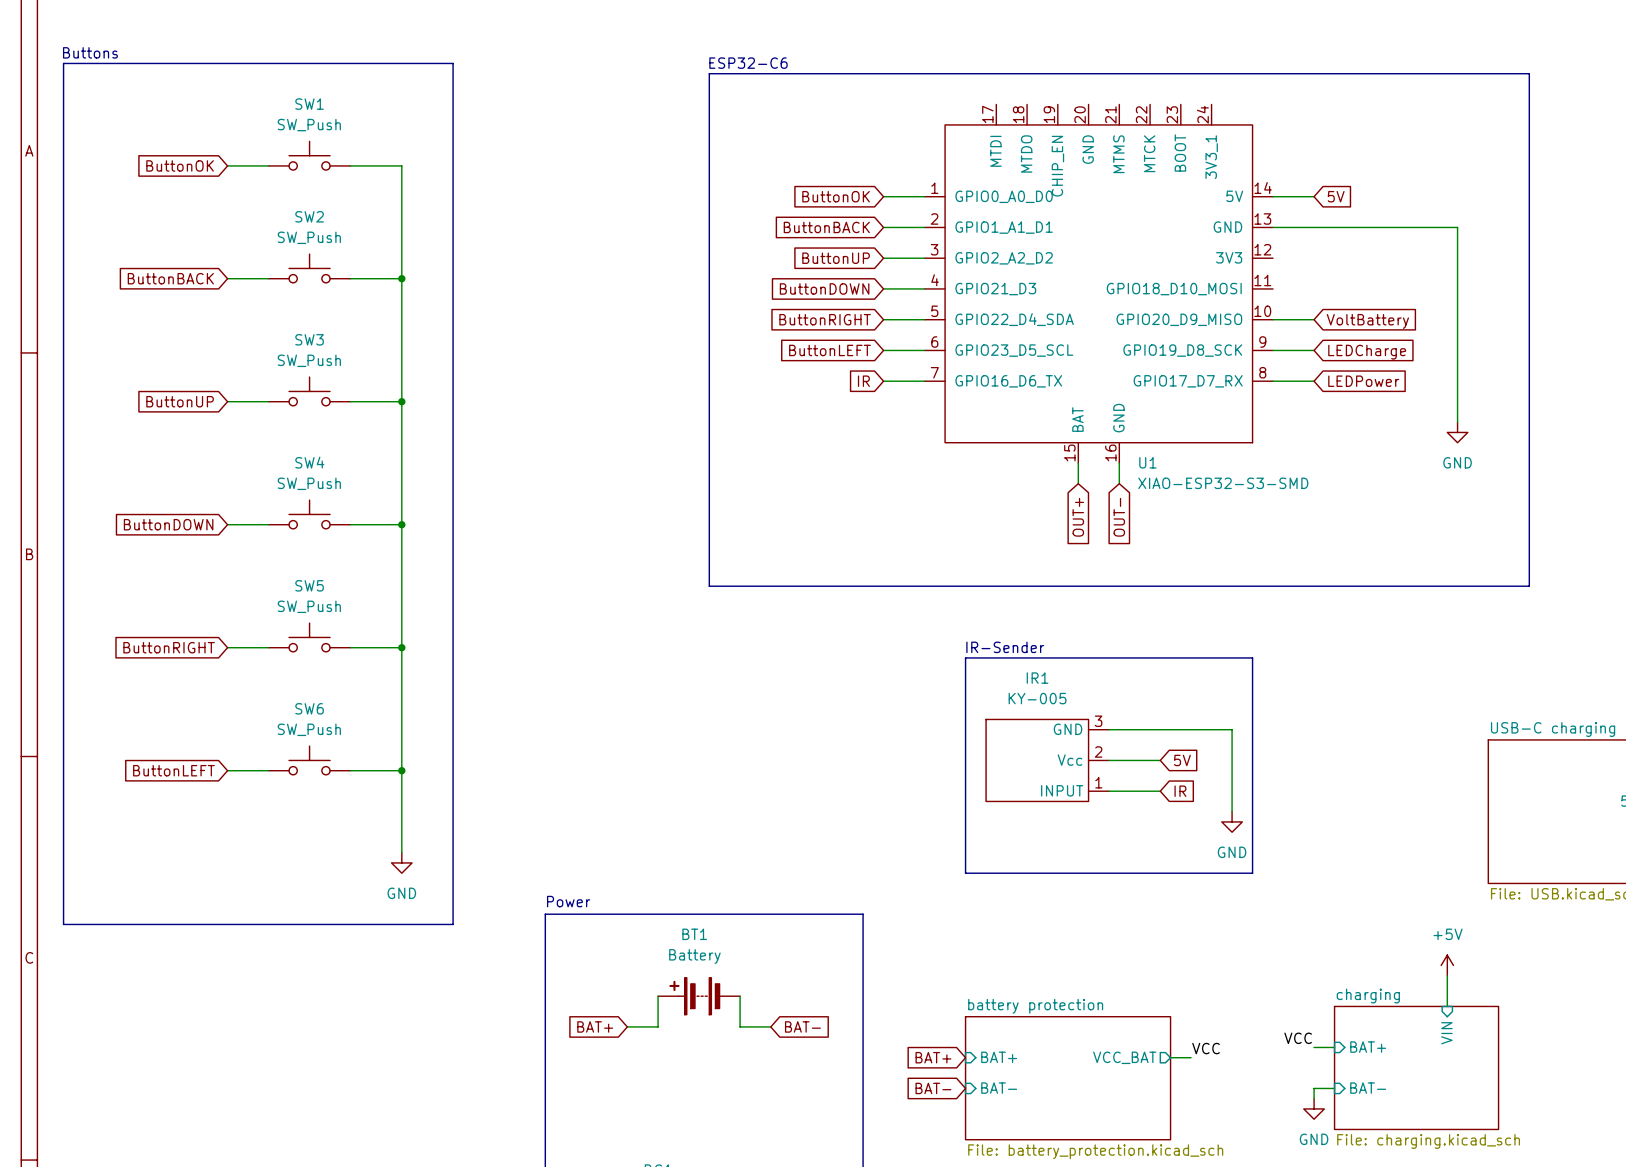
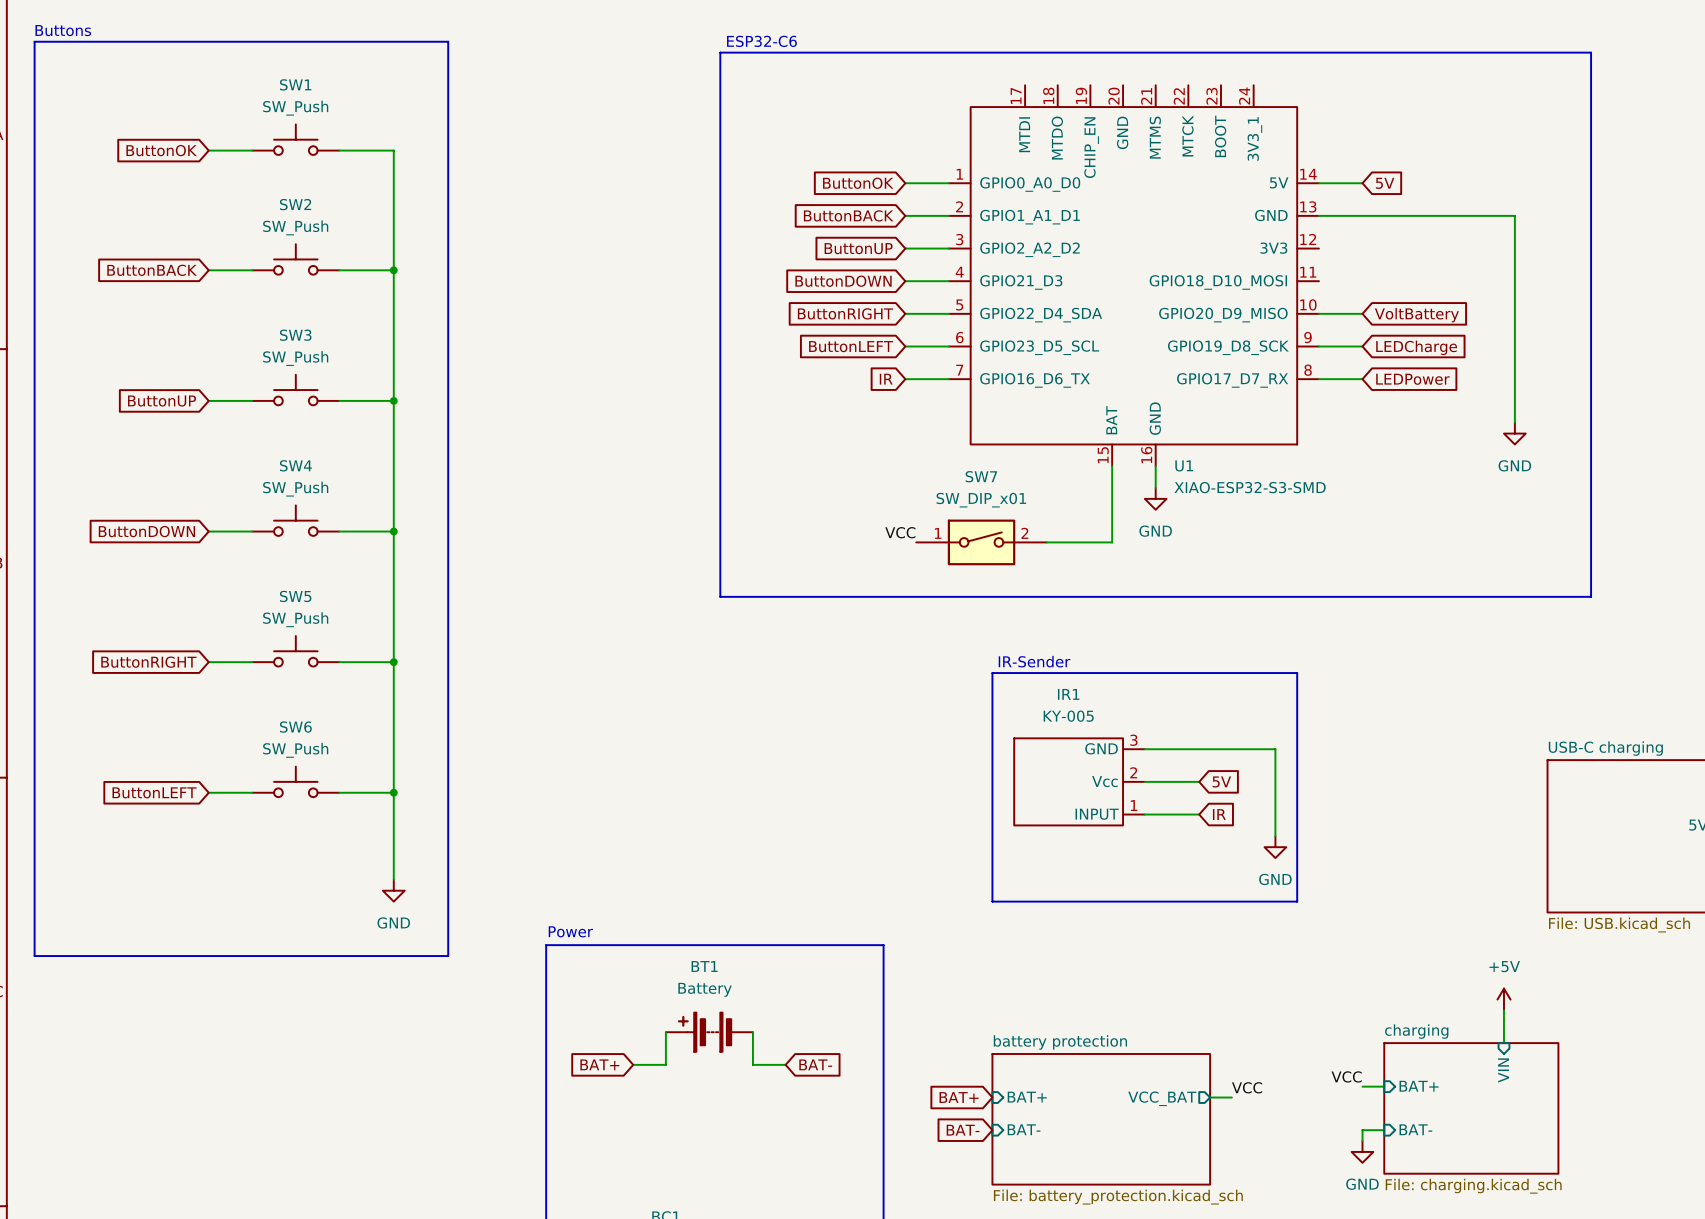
wire: none -> (1112, 488) (1112, 542) (1046, 542)
power symbol: none -> GND (1155, 498)
global label: OUT+ (1078, 517) -> none
global label: OUT- (1119, 517) -> none
label: none -> VCC (900, 532)
SW7: none -> SW_DIP_x01 (981, 542)

